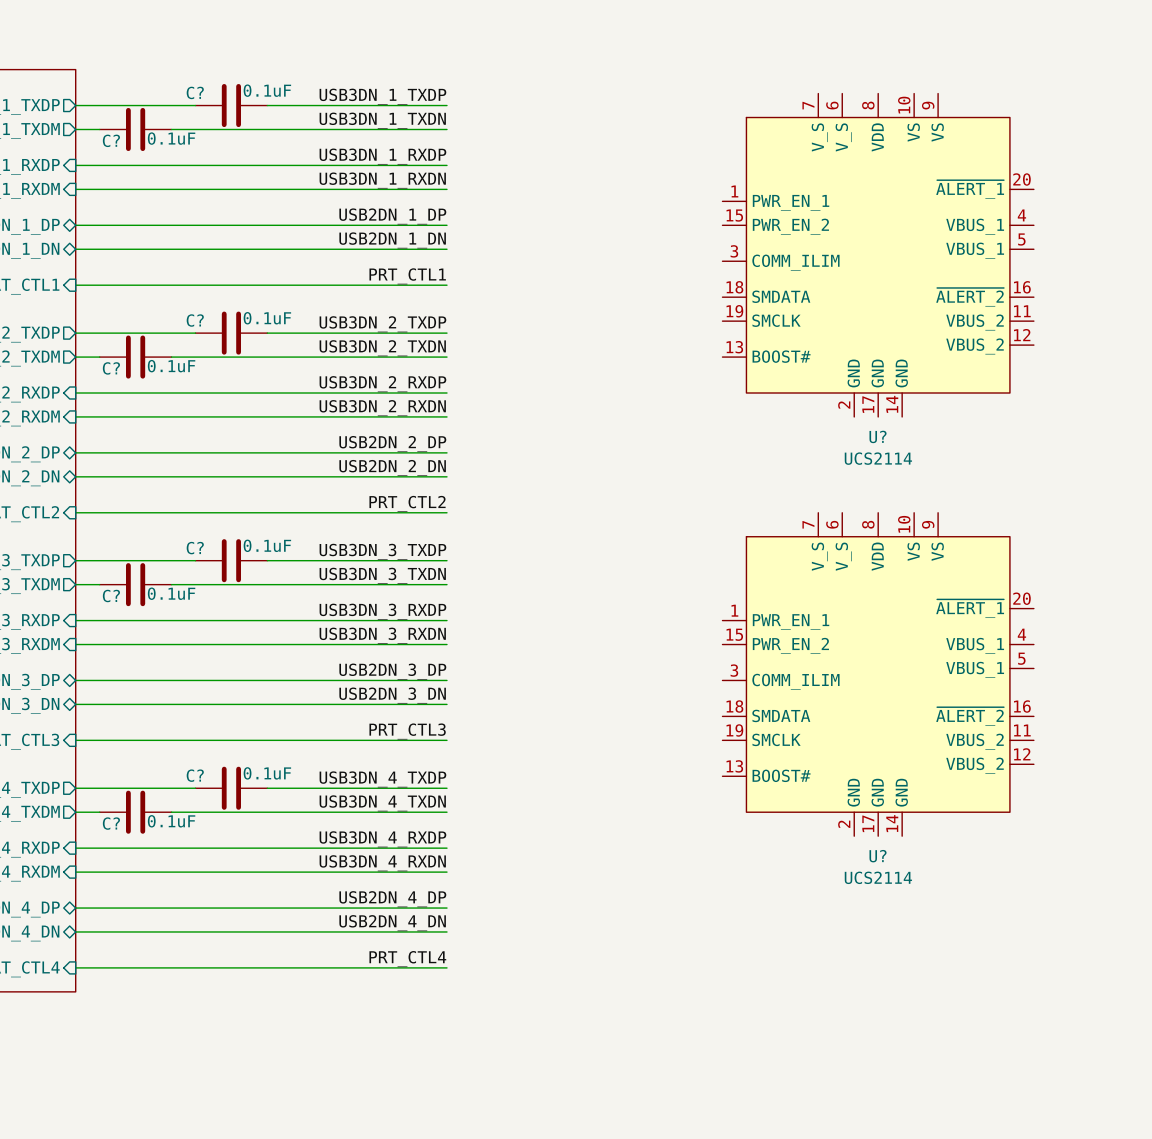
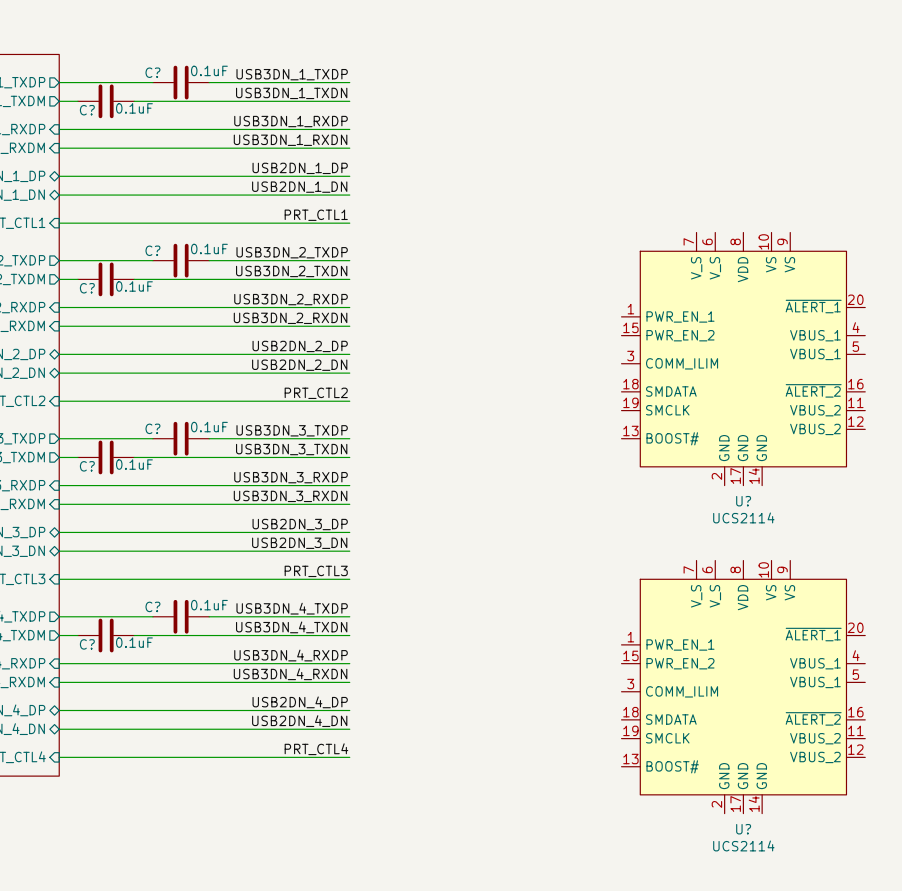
U?: UCS2114 (878, 255) -> none
U?: none -> UCS2114 (743, 359)
U?: UCS2114 (878, 674) -> none
U?: none -> UCS2114 (743, 687)

